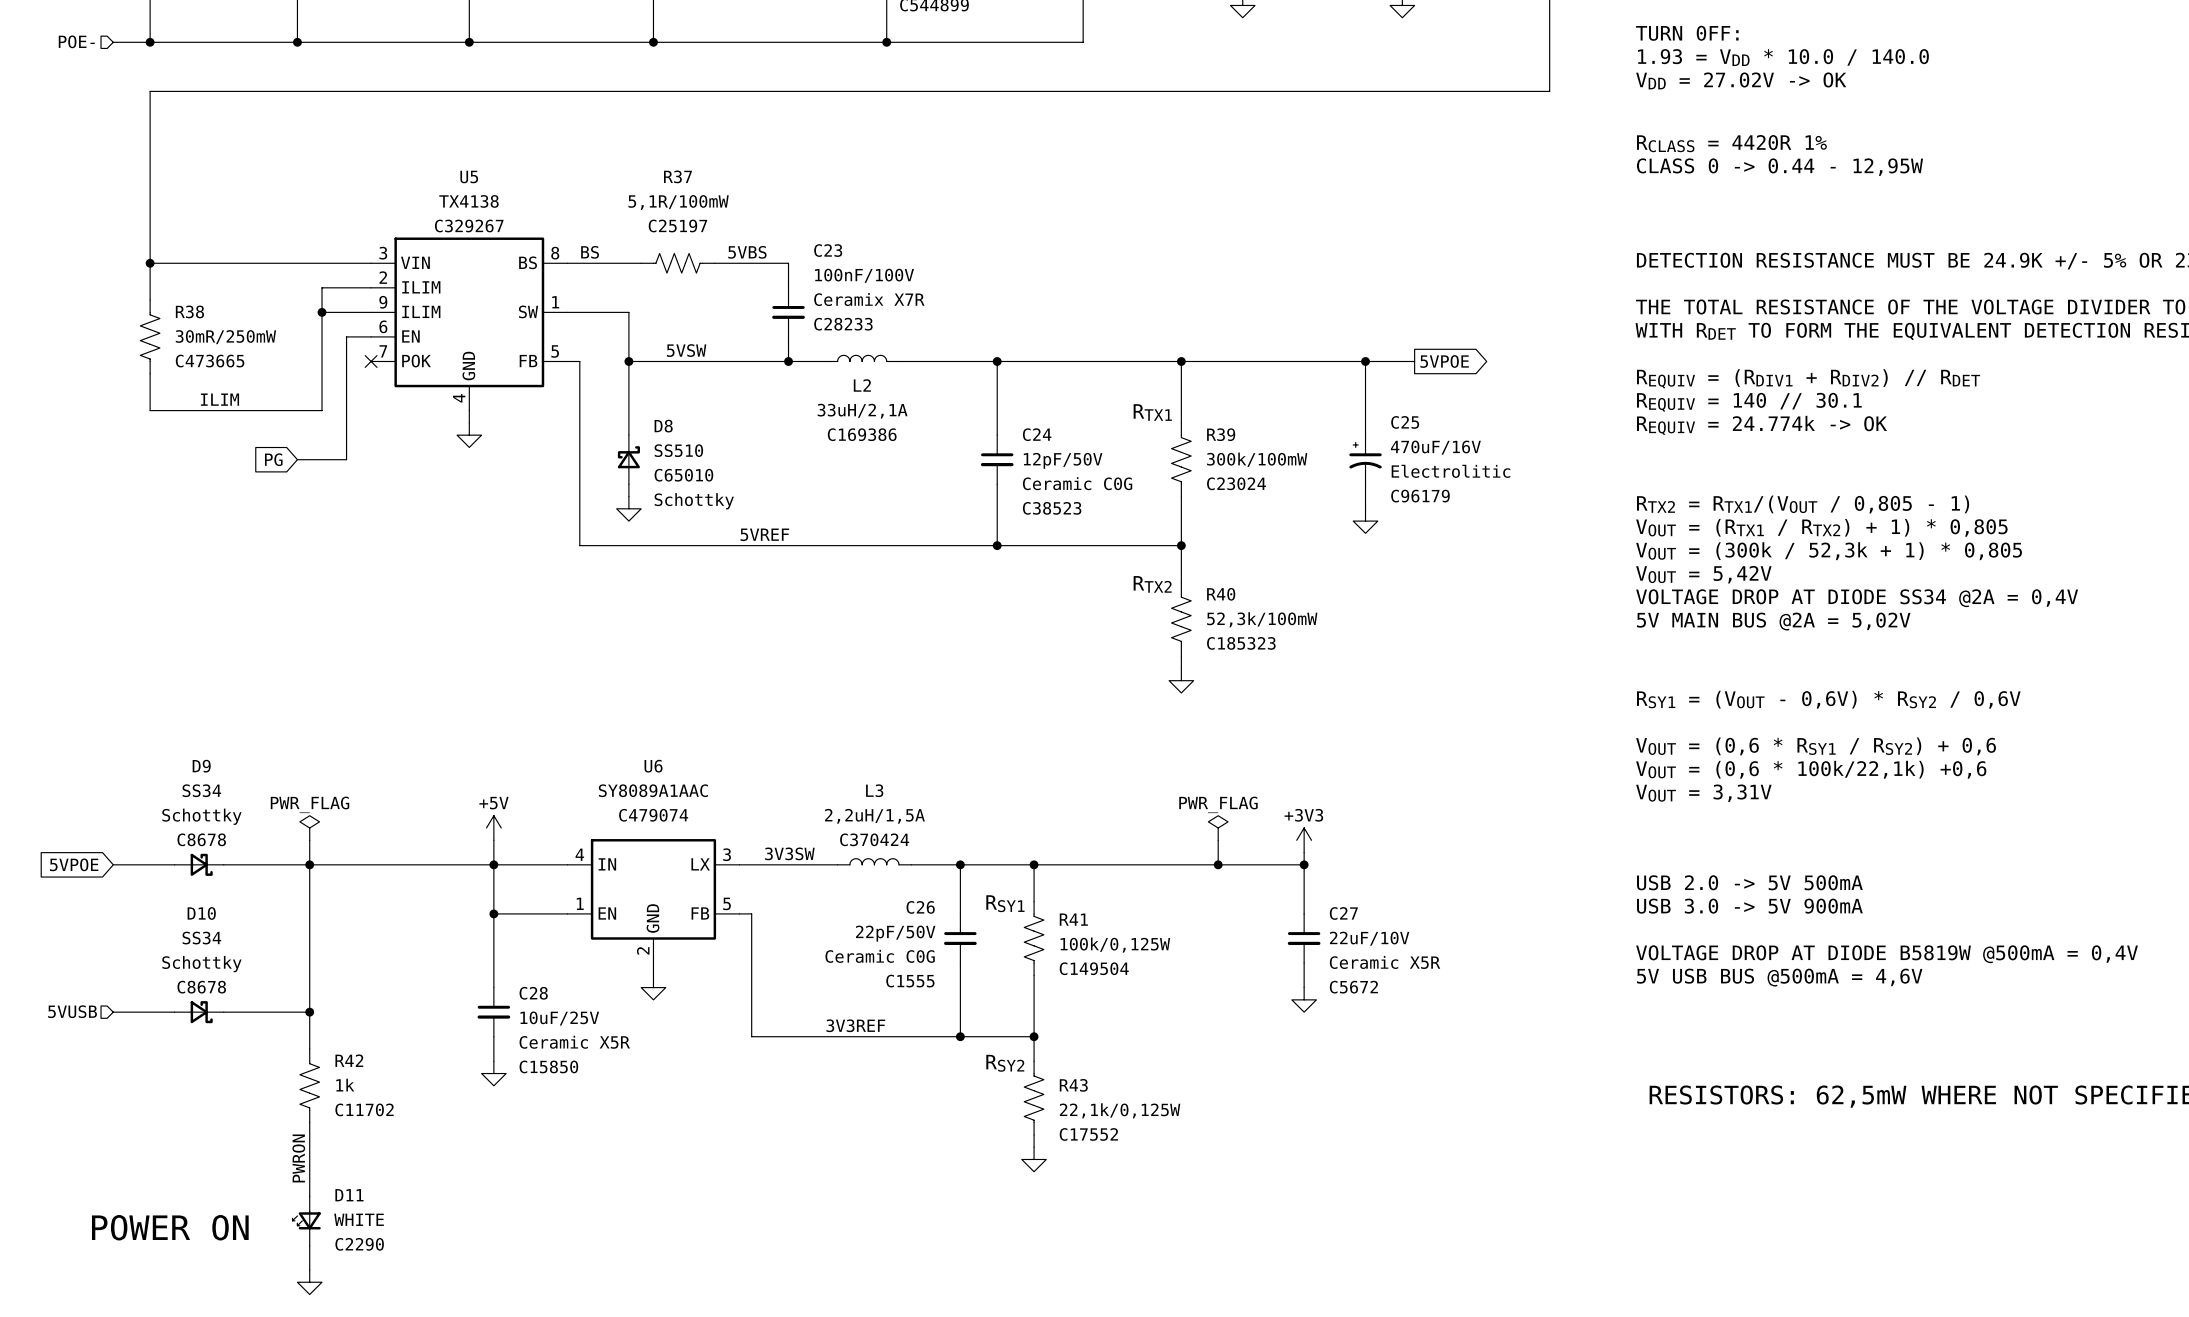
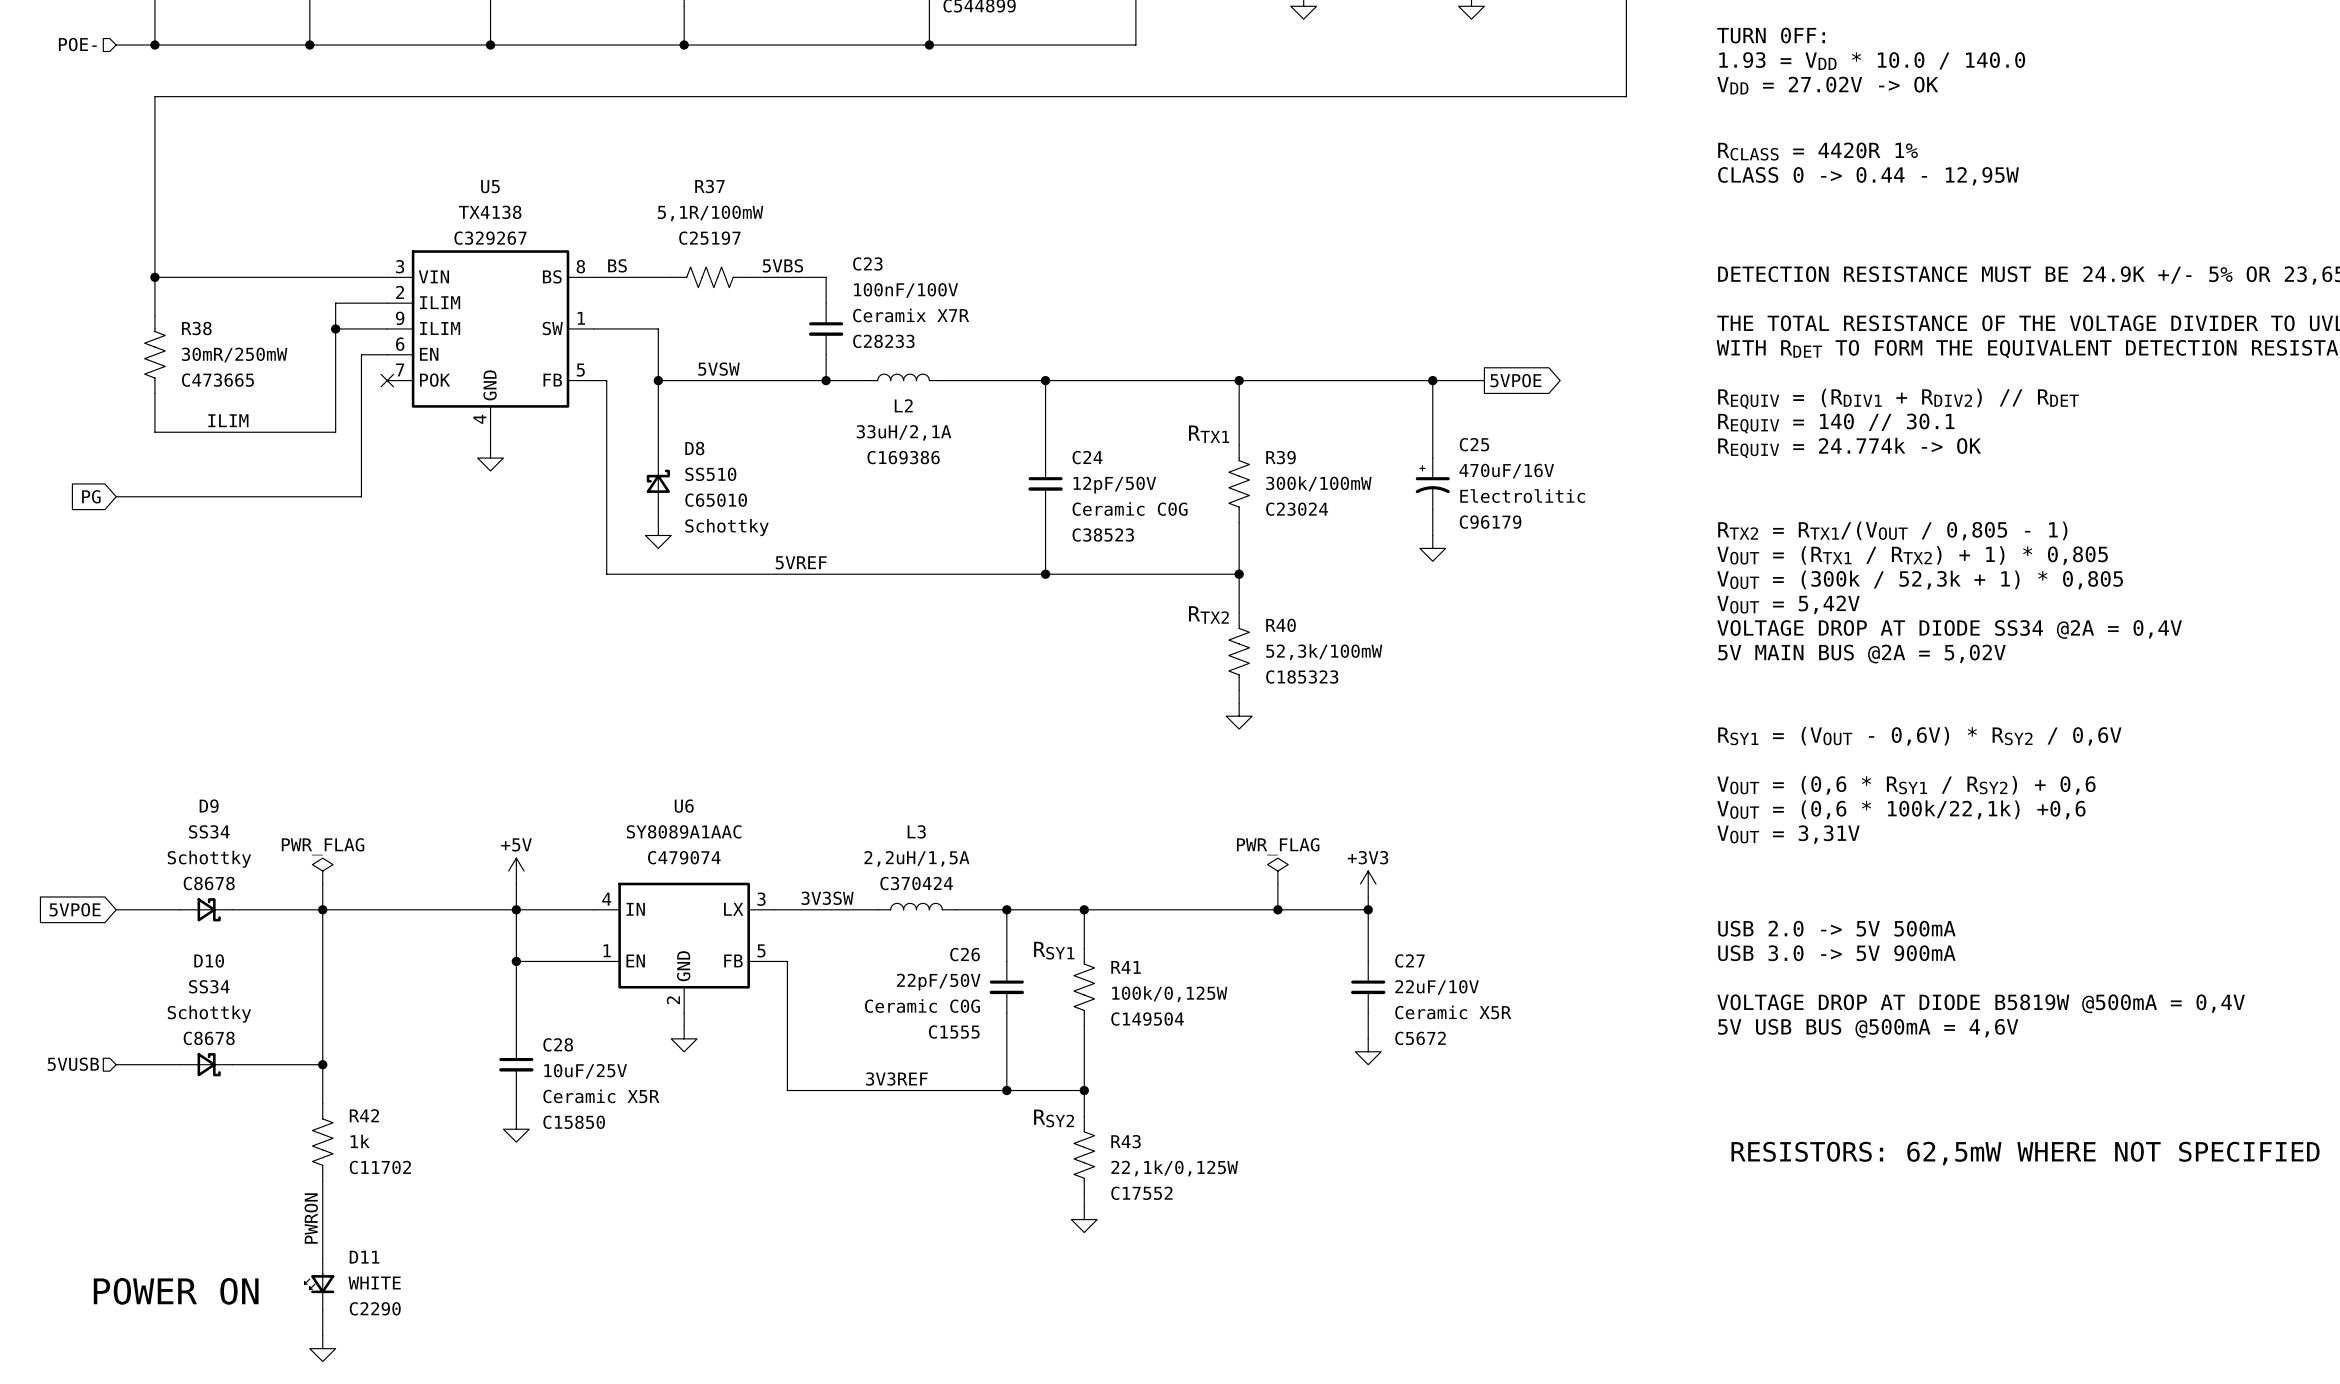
global label position: PG (273, 459) -> PG (91, 496)
wire: (297, 459) (346, 459) -> (116, 496) (361, 496) (361, 483)

